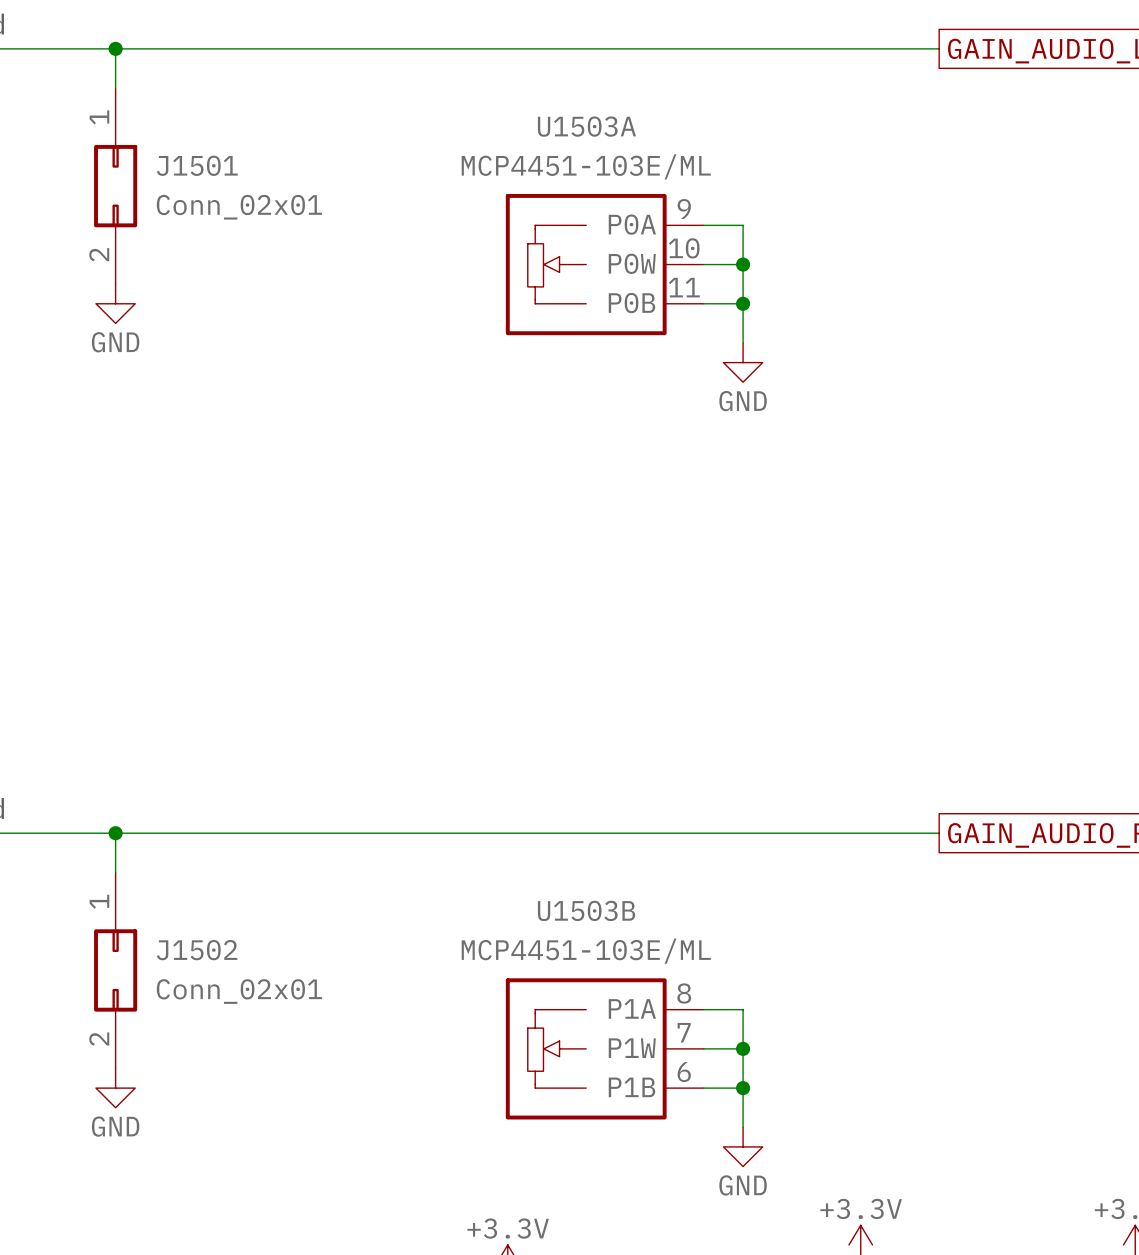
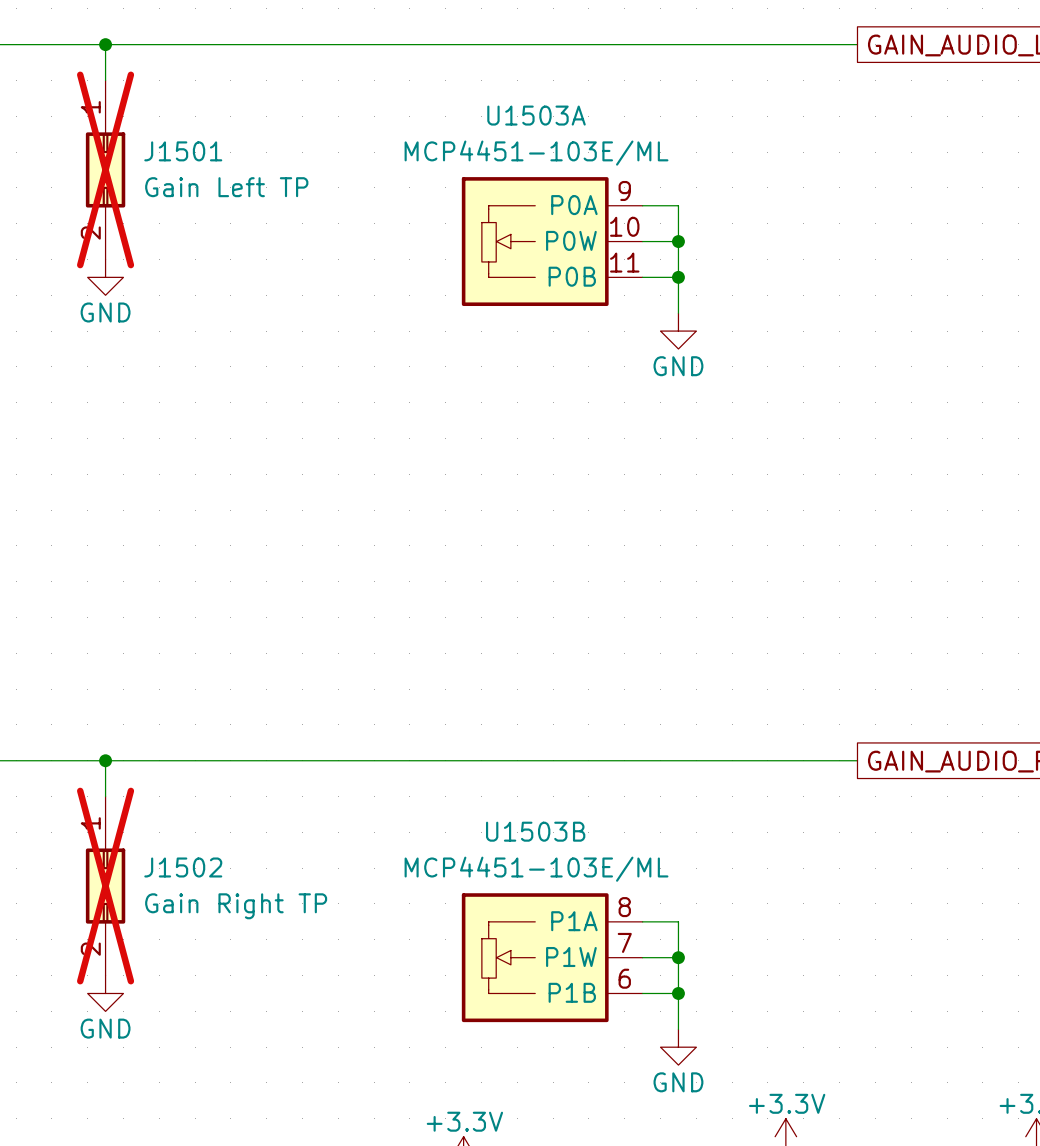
J1501 do-not-place cross: none -> (105, 169)
J1501 value: Conn_02x01 (239, 207) -> Gain Left TP (226, 187)
J1502 do-not-place cross: none -> (105, 886)
J1502 value: Conn_02x01 (239, 991) -> Gain Right TP (236, 906)

